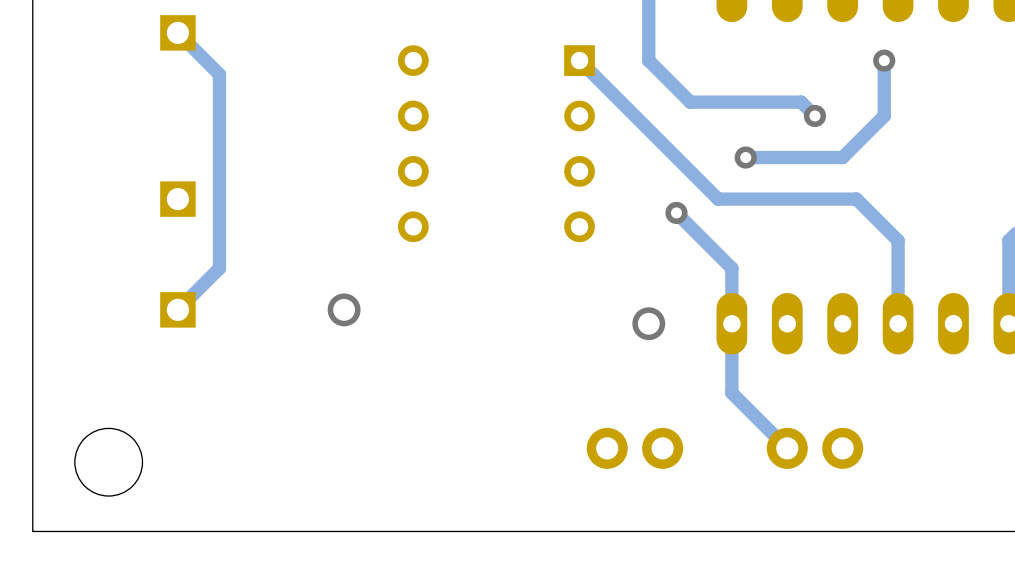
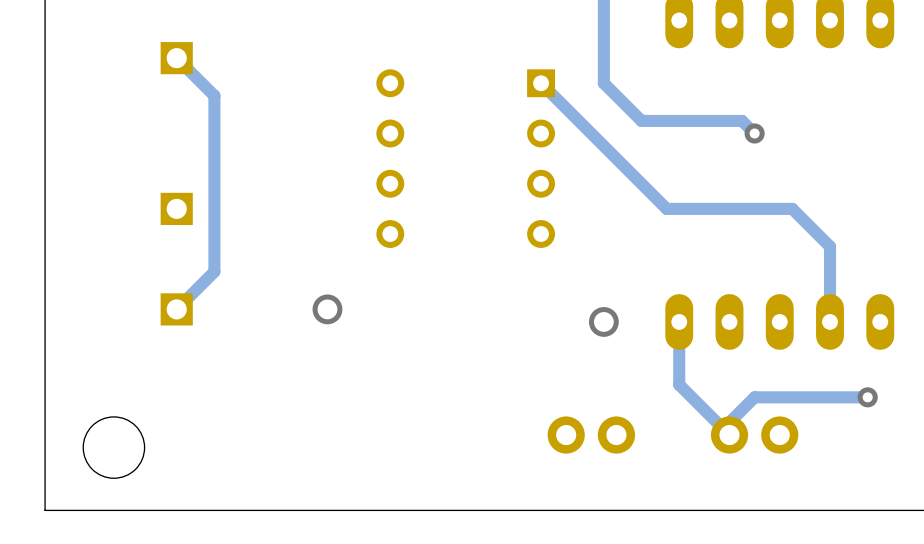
track: (884, 60) (884, 115) (842, 157) (745, 157) -> none
via: (884, 60) -> none
via: (745, 157) -> none
track: (676, 212) (731, 268) (731, 323) -> none
via: (676, 212) -> none
track: none -> (867, 397) (754, 397) (729, 422) (729, 435)
via: none -> (867, 397)

